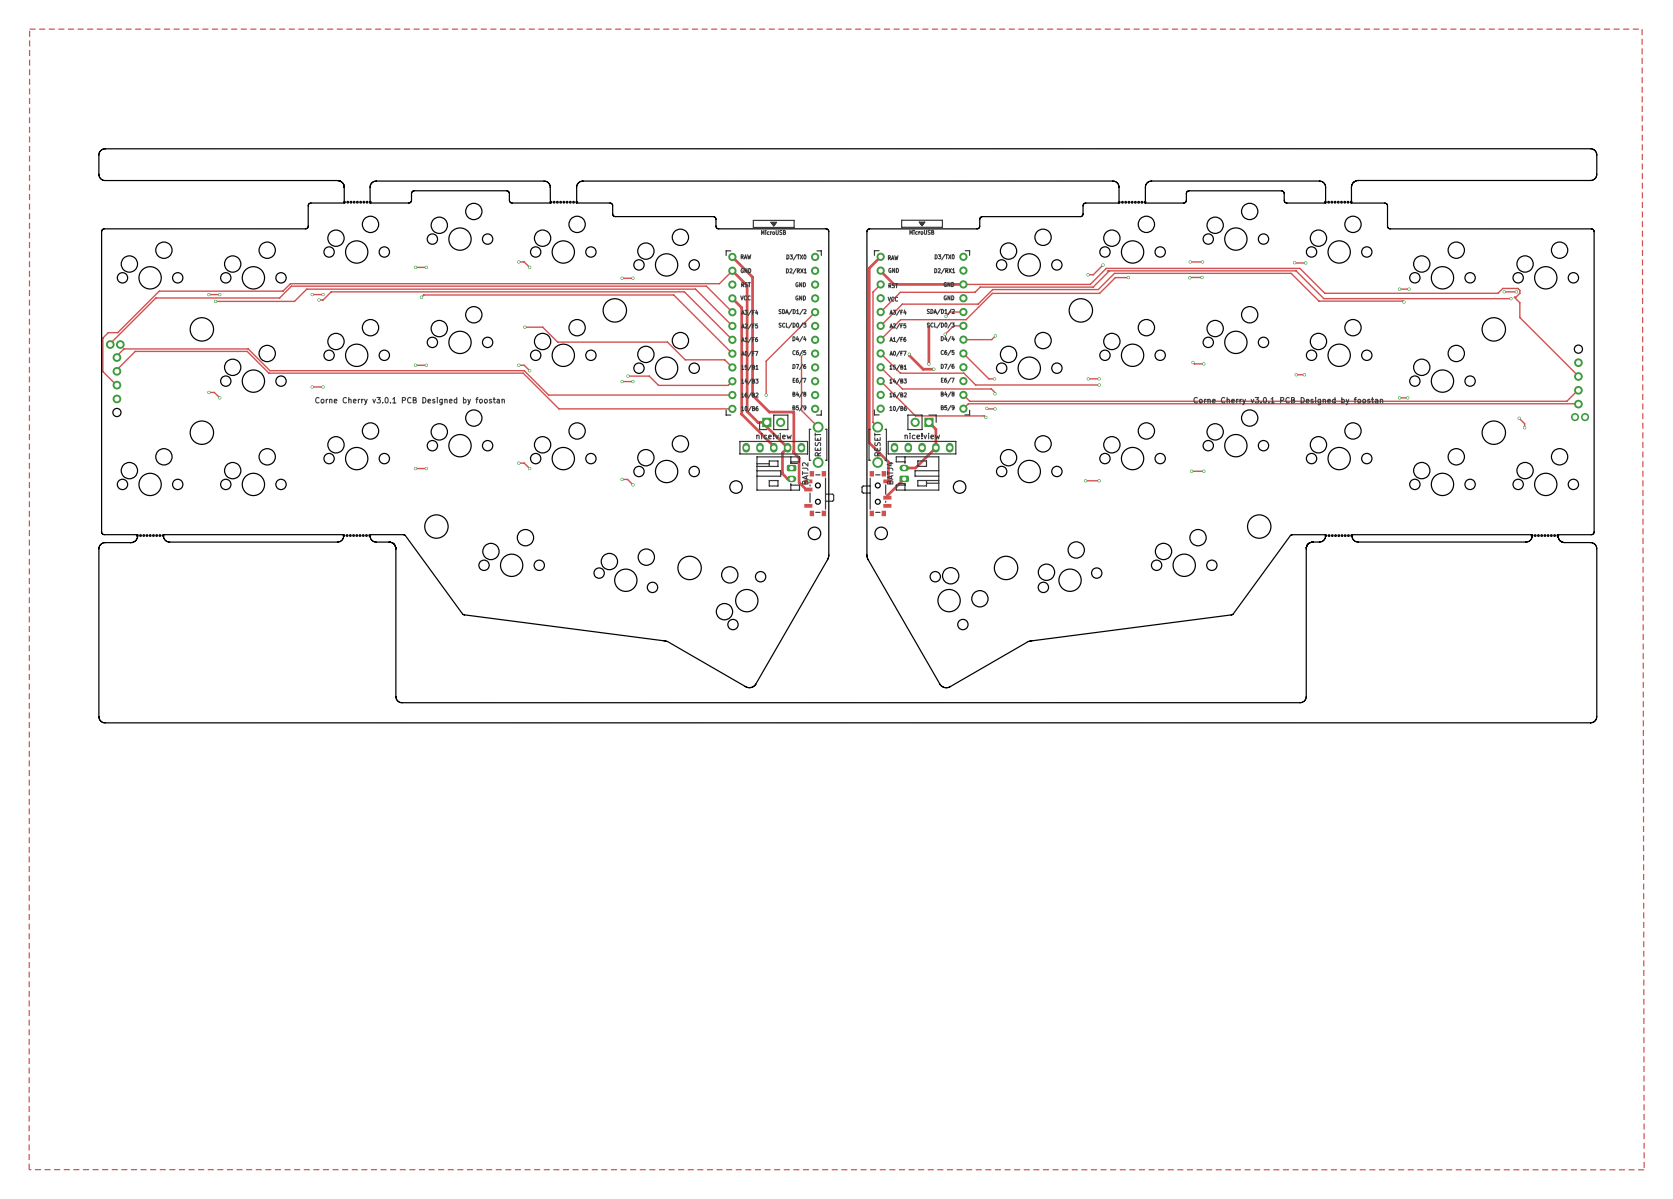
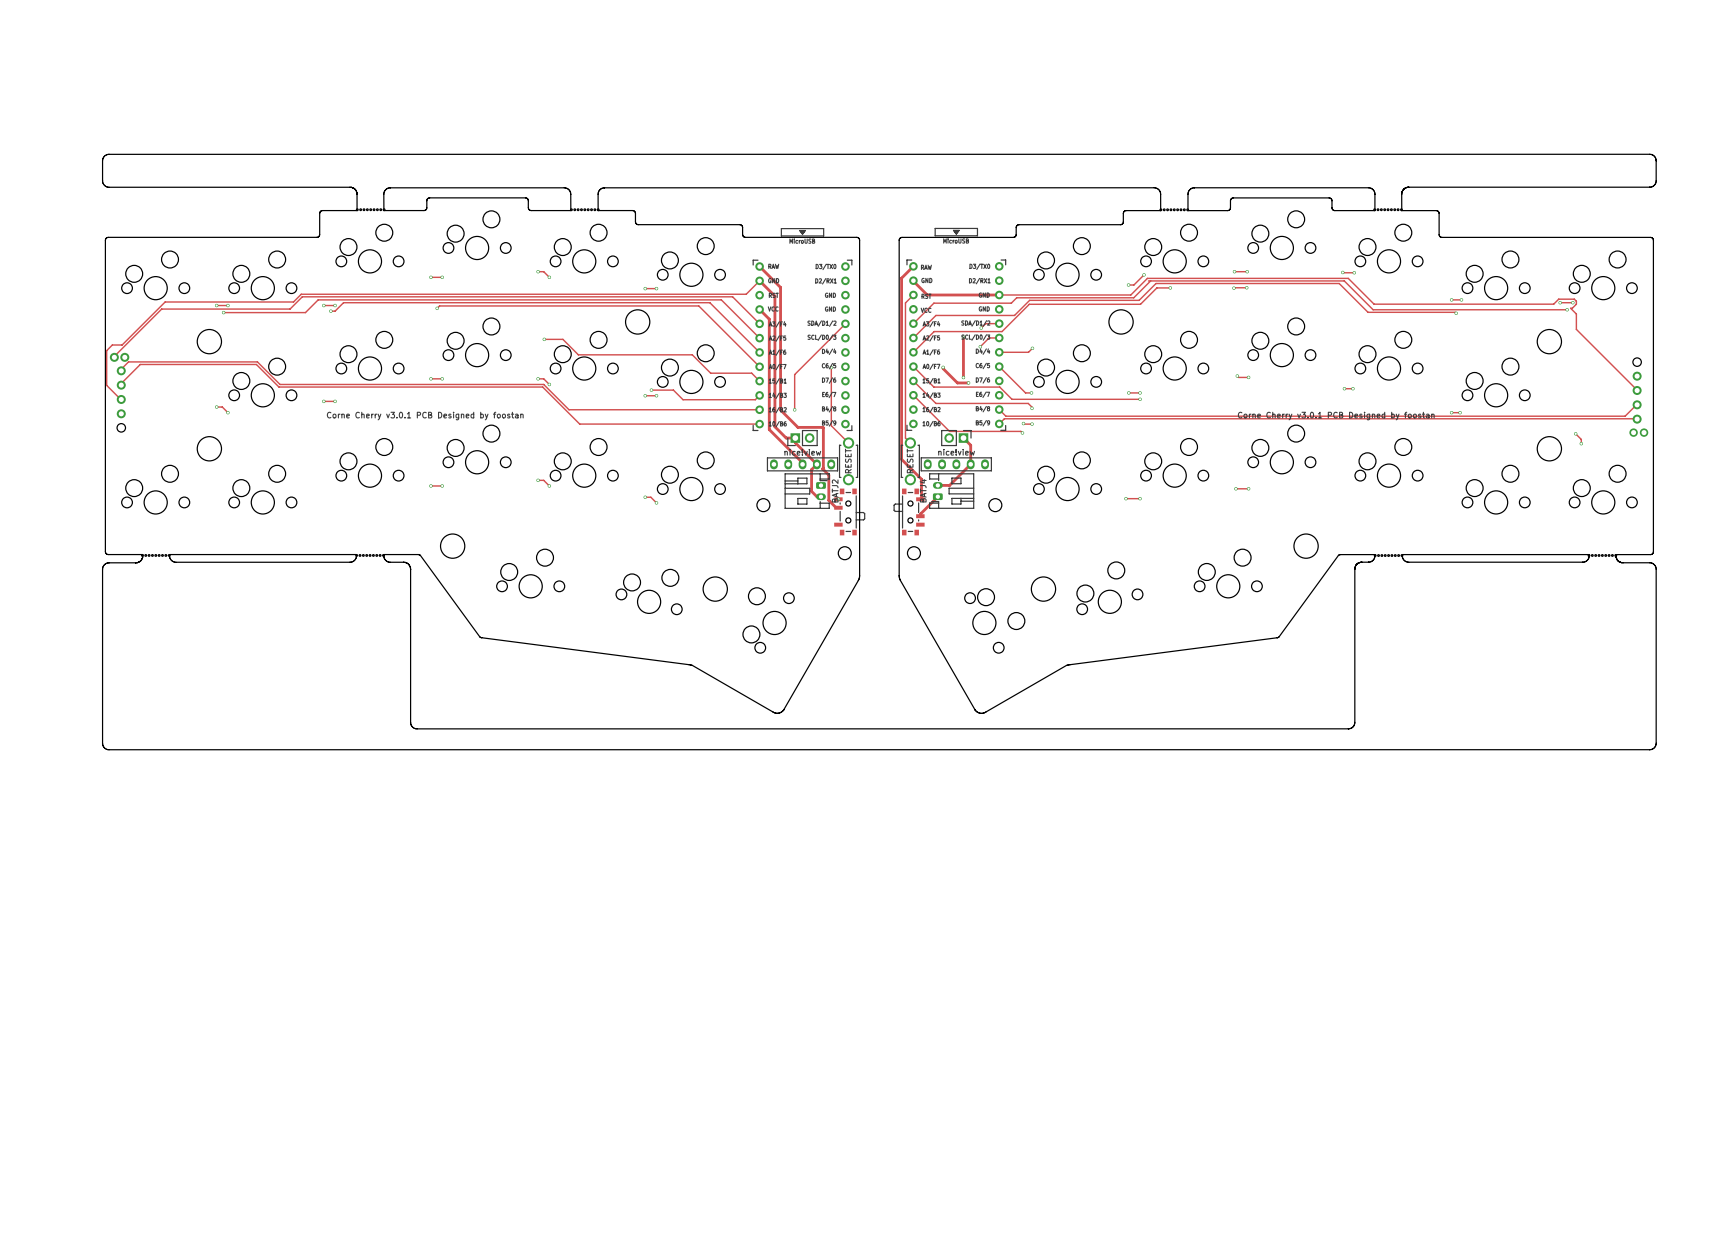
zone outline: (29, 29) (1642, 29) (1644, 1169) (29, 1169) (29, 29) -> none

